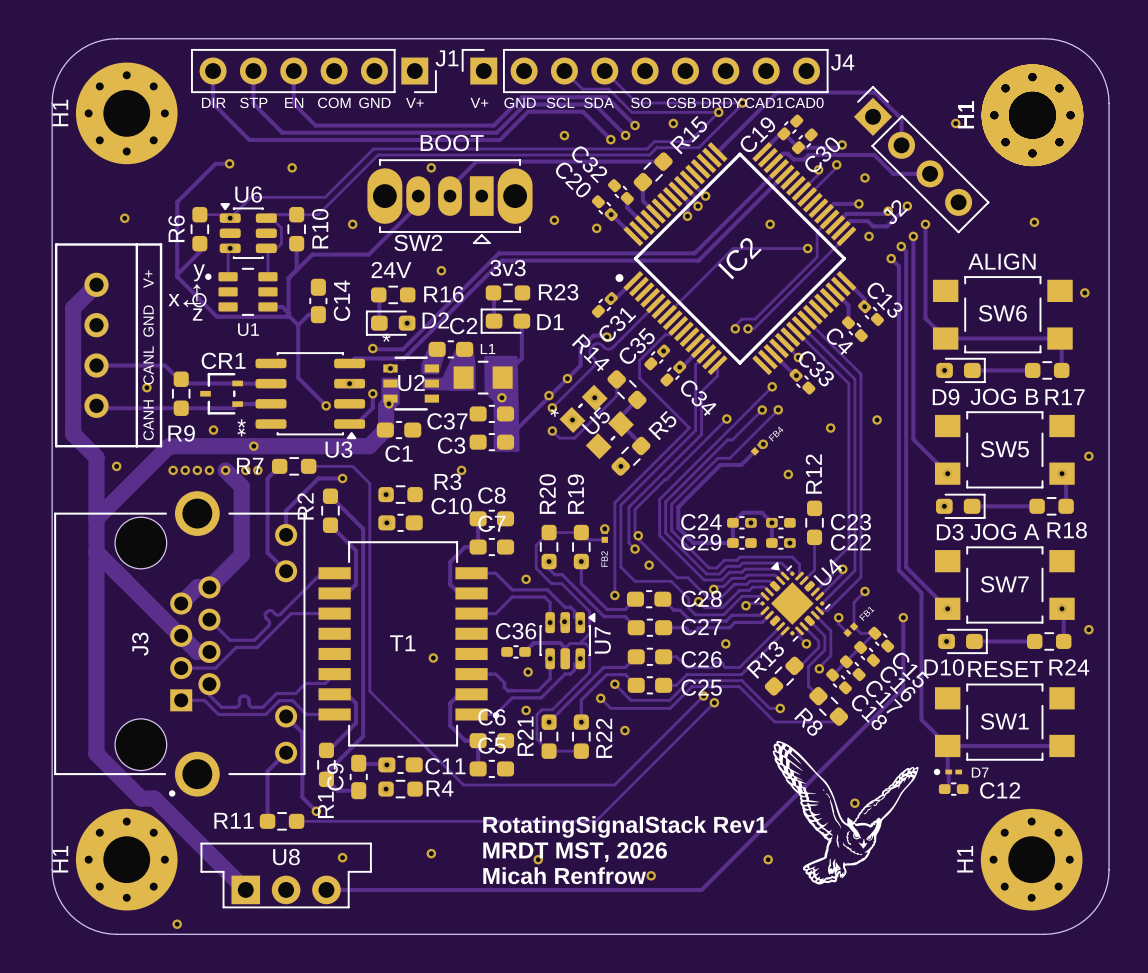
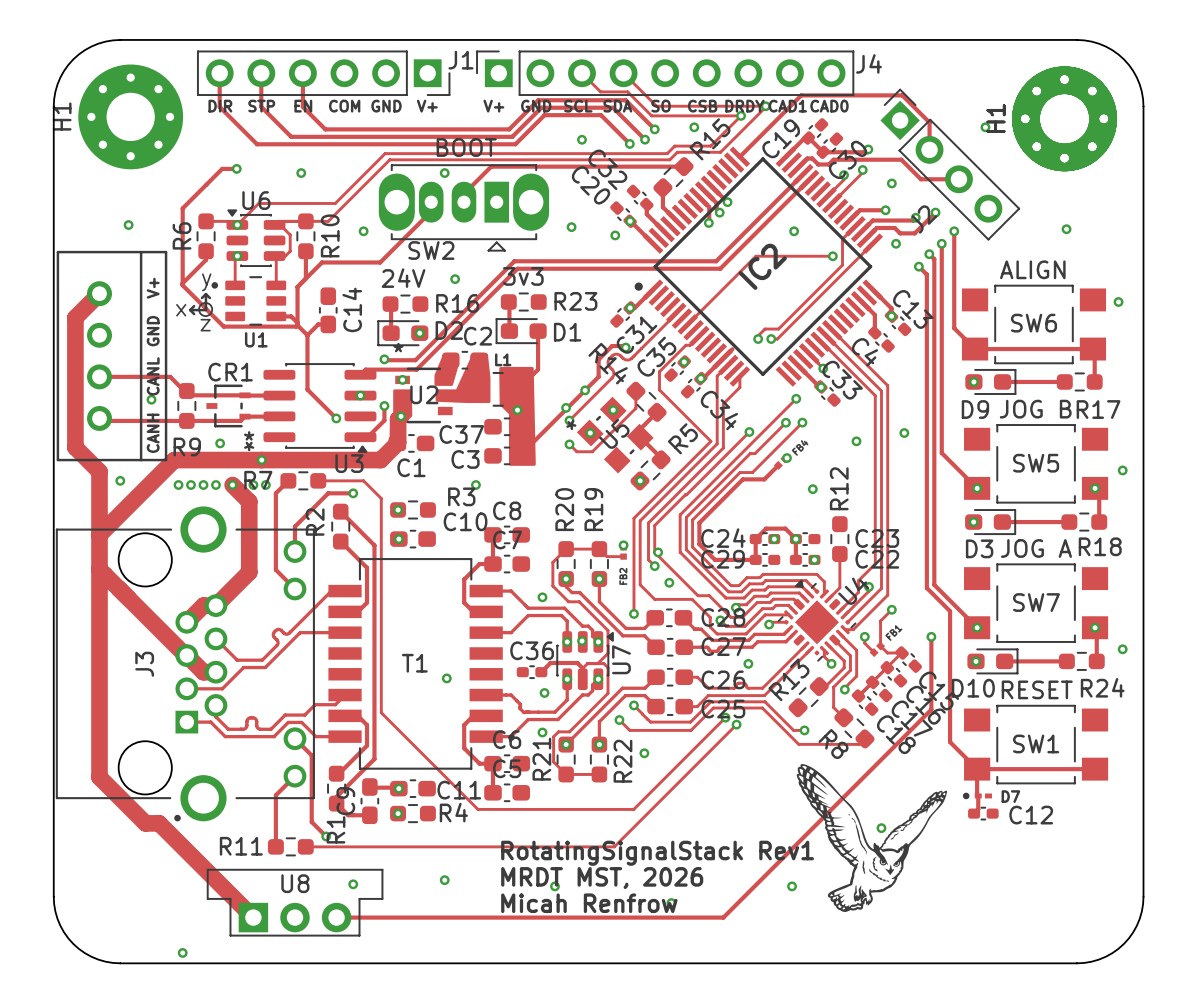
H1: (126, 859) -> none
H1: (1031, 859) -> none

